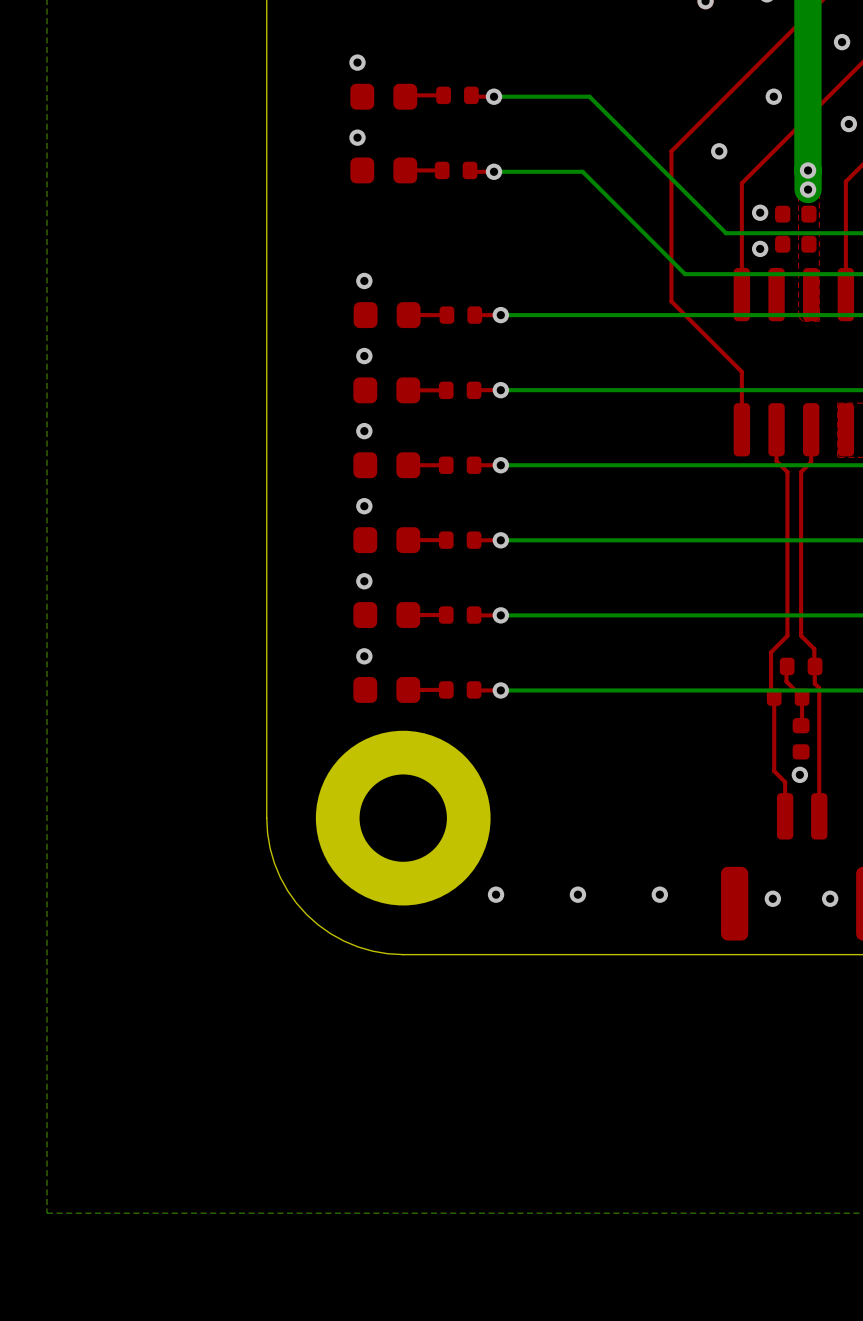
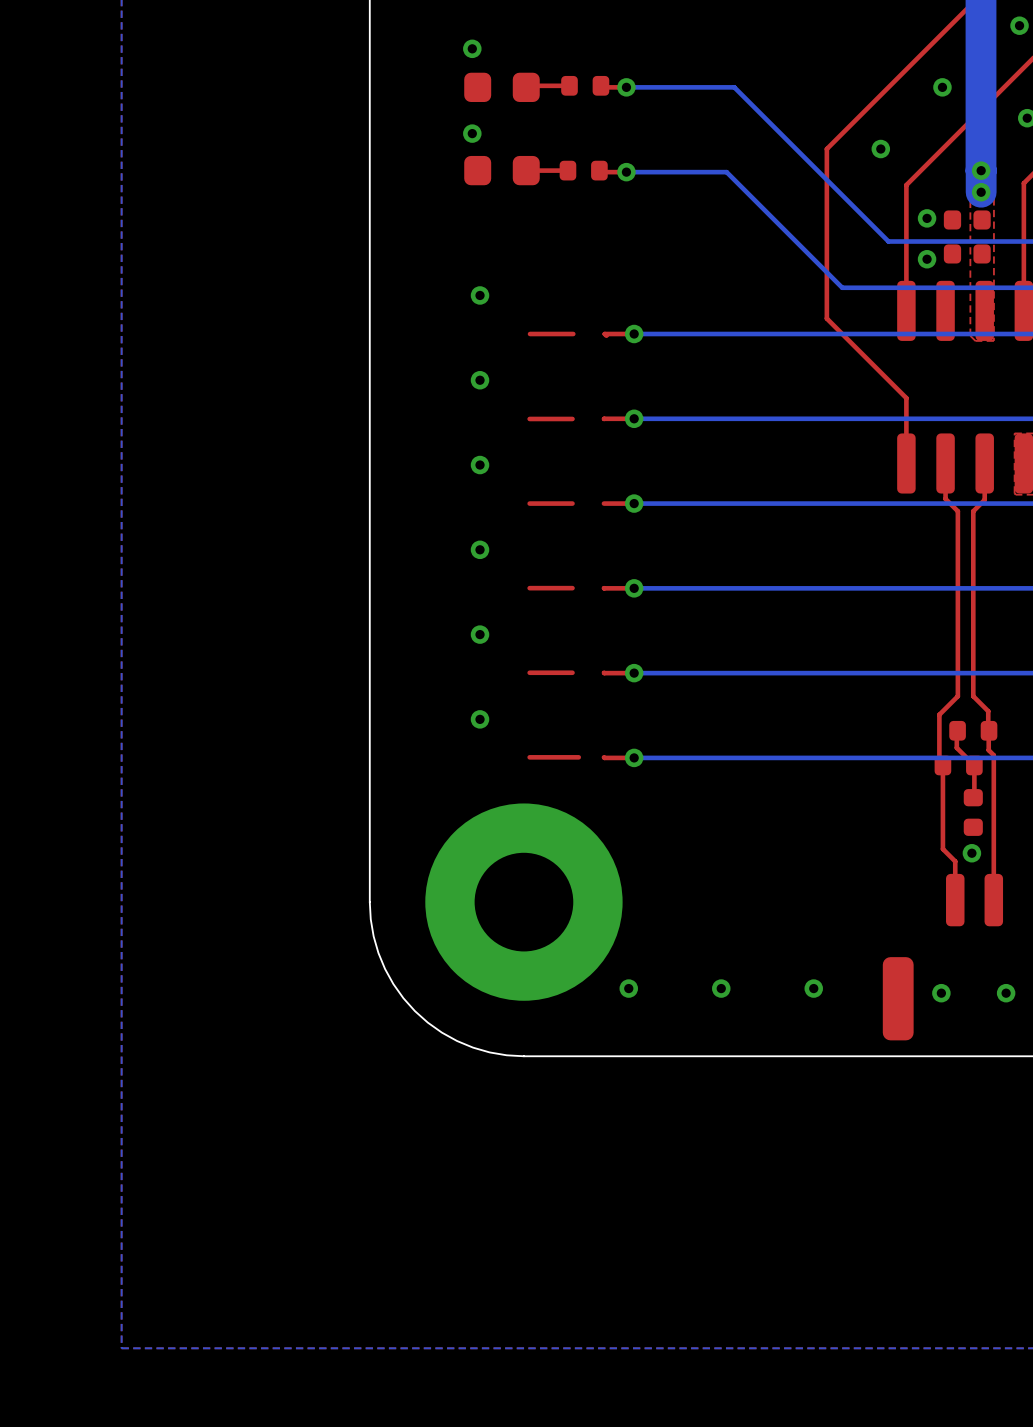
part: (387, 315) -> none
part: (460, 315) -> none
part: (386, 390) -> none
part: (460, 390) -> none
part: (386, 465) -> none
part: (460, 465) -> none
part: (386, 540) -> none
part: (460, 540) -> none
part: (386, 615) -> none
part: (460, 615) -> none
part: (386, 689) -> none
part: (460, 689) -> none

